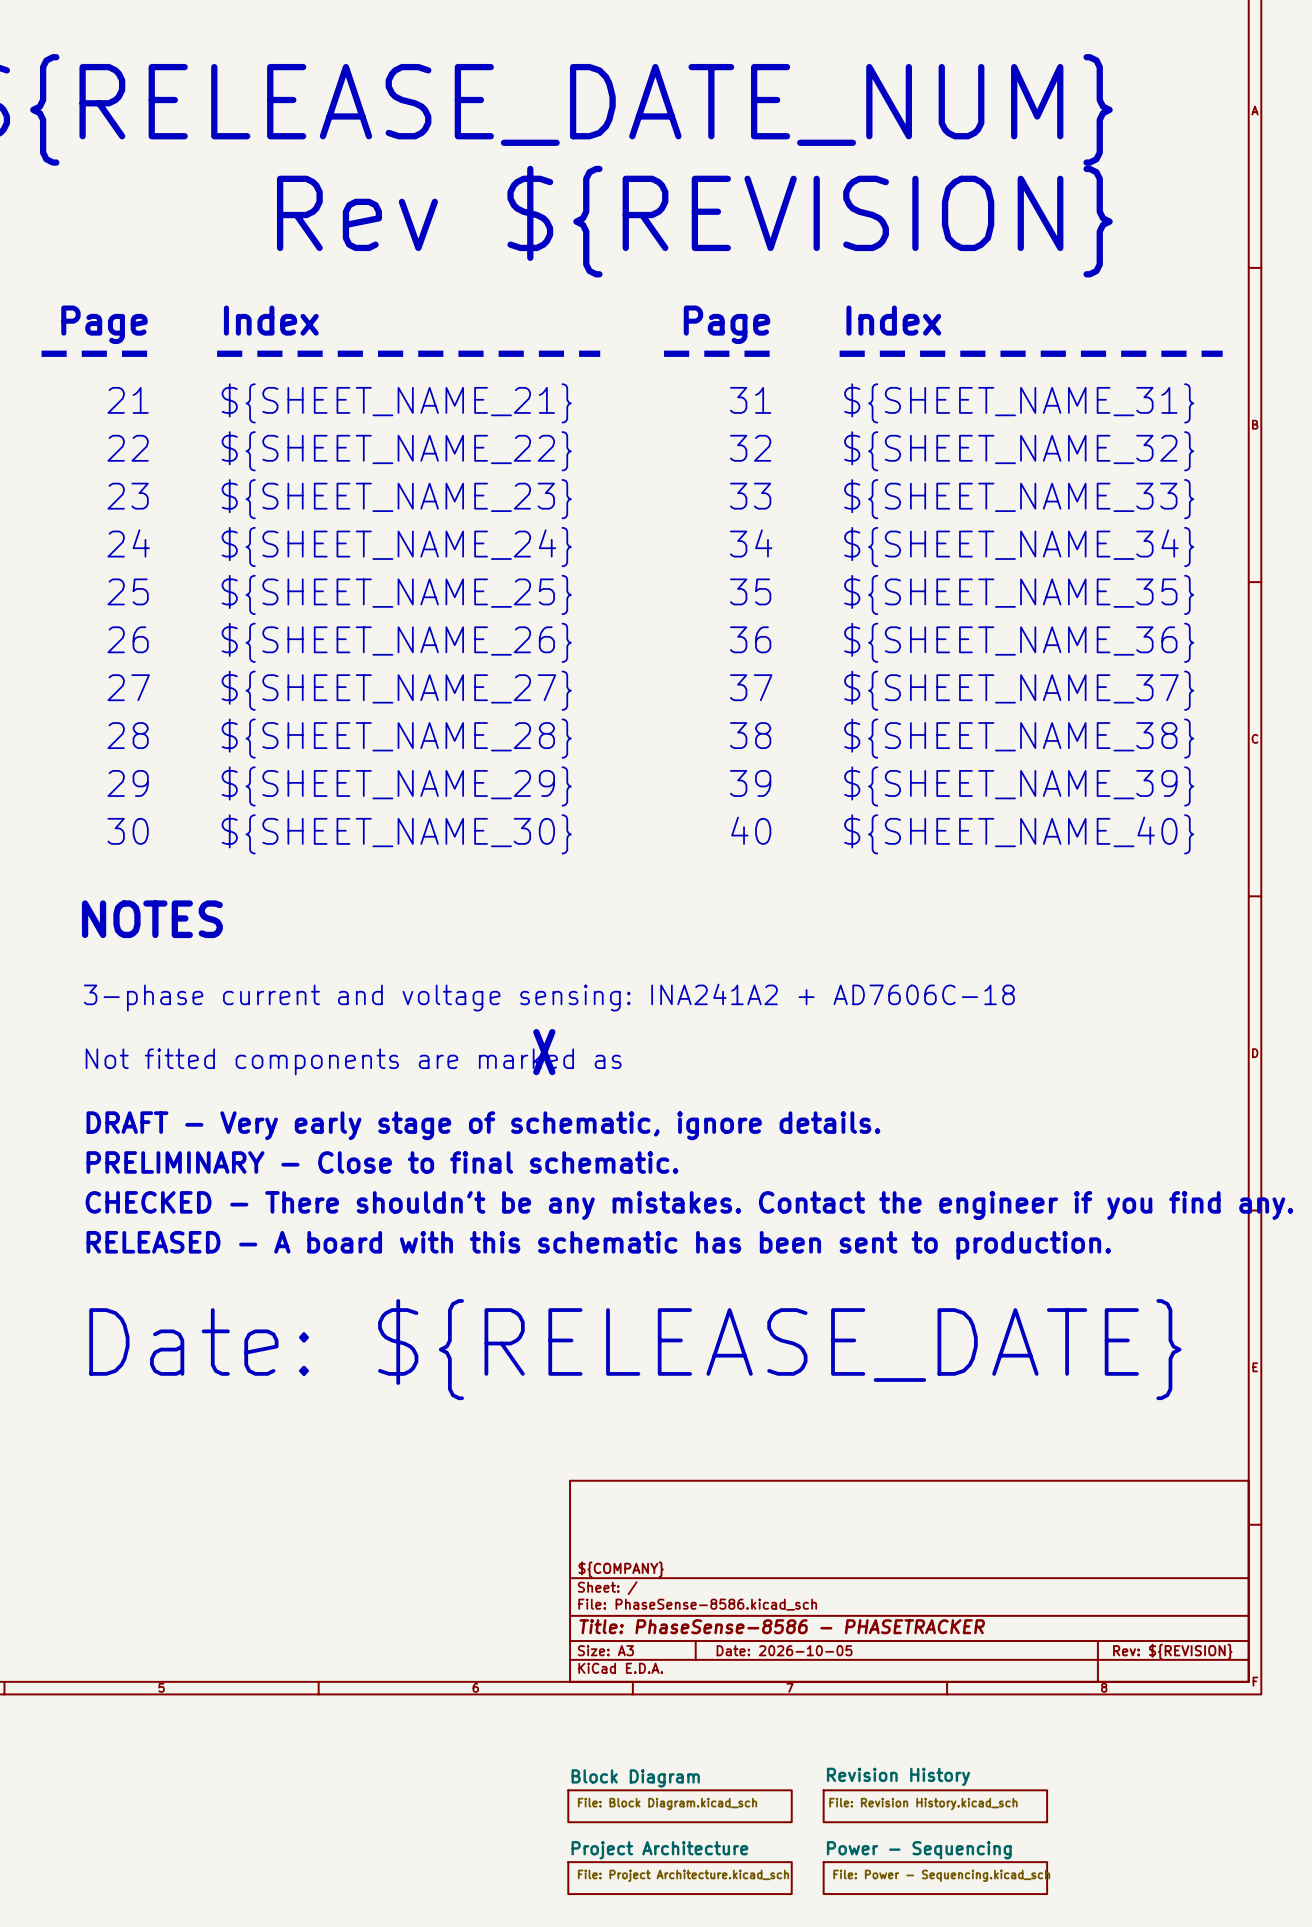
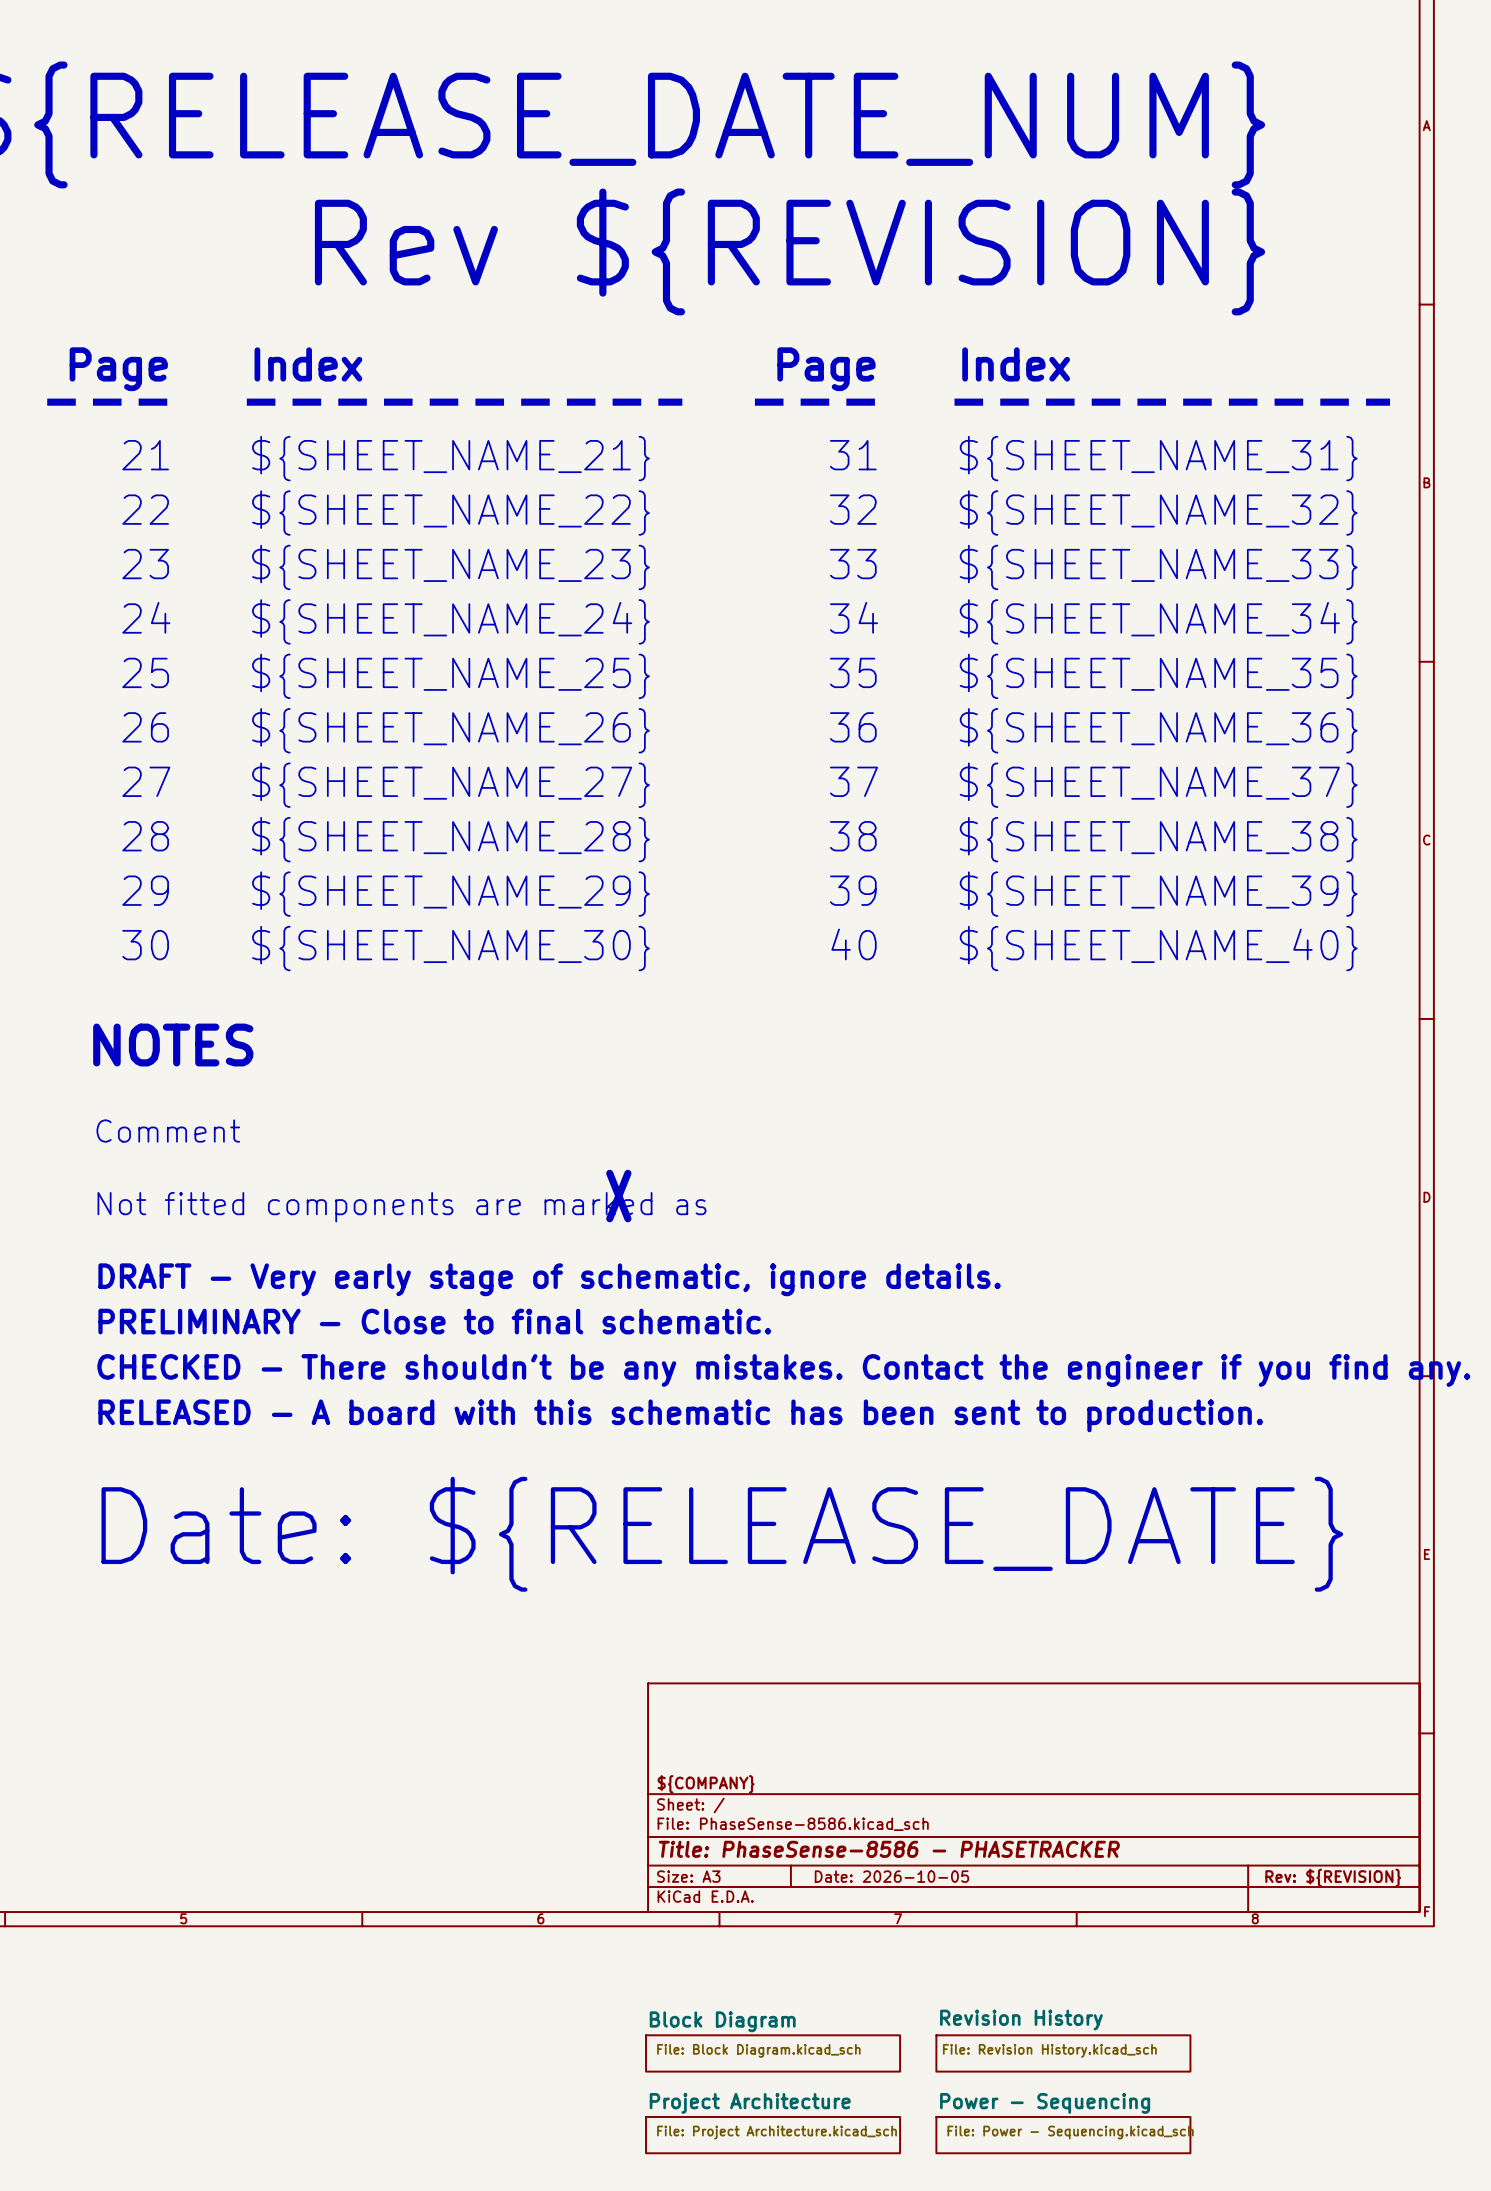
text: 3-phase current and voltage sensing: INA241A2 + AD7606C-18 (549, 997) -> Comment (168, 1131)

